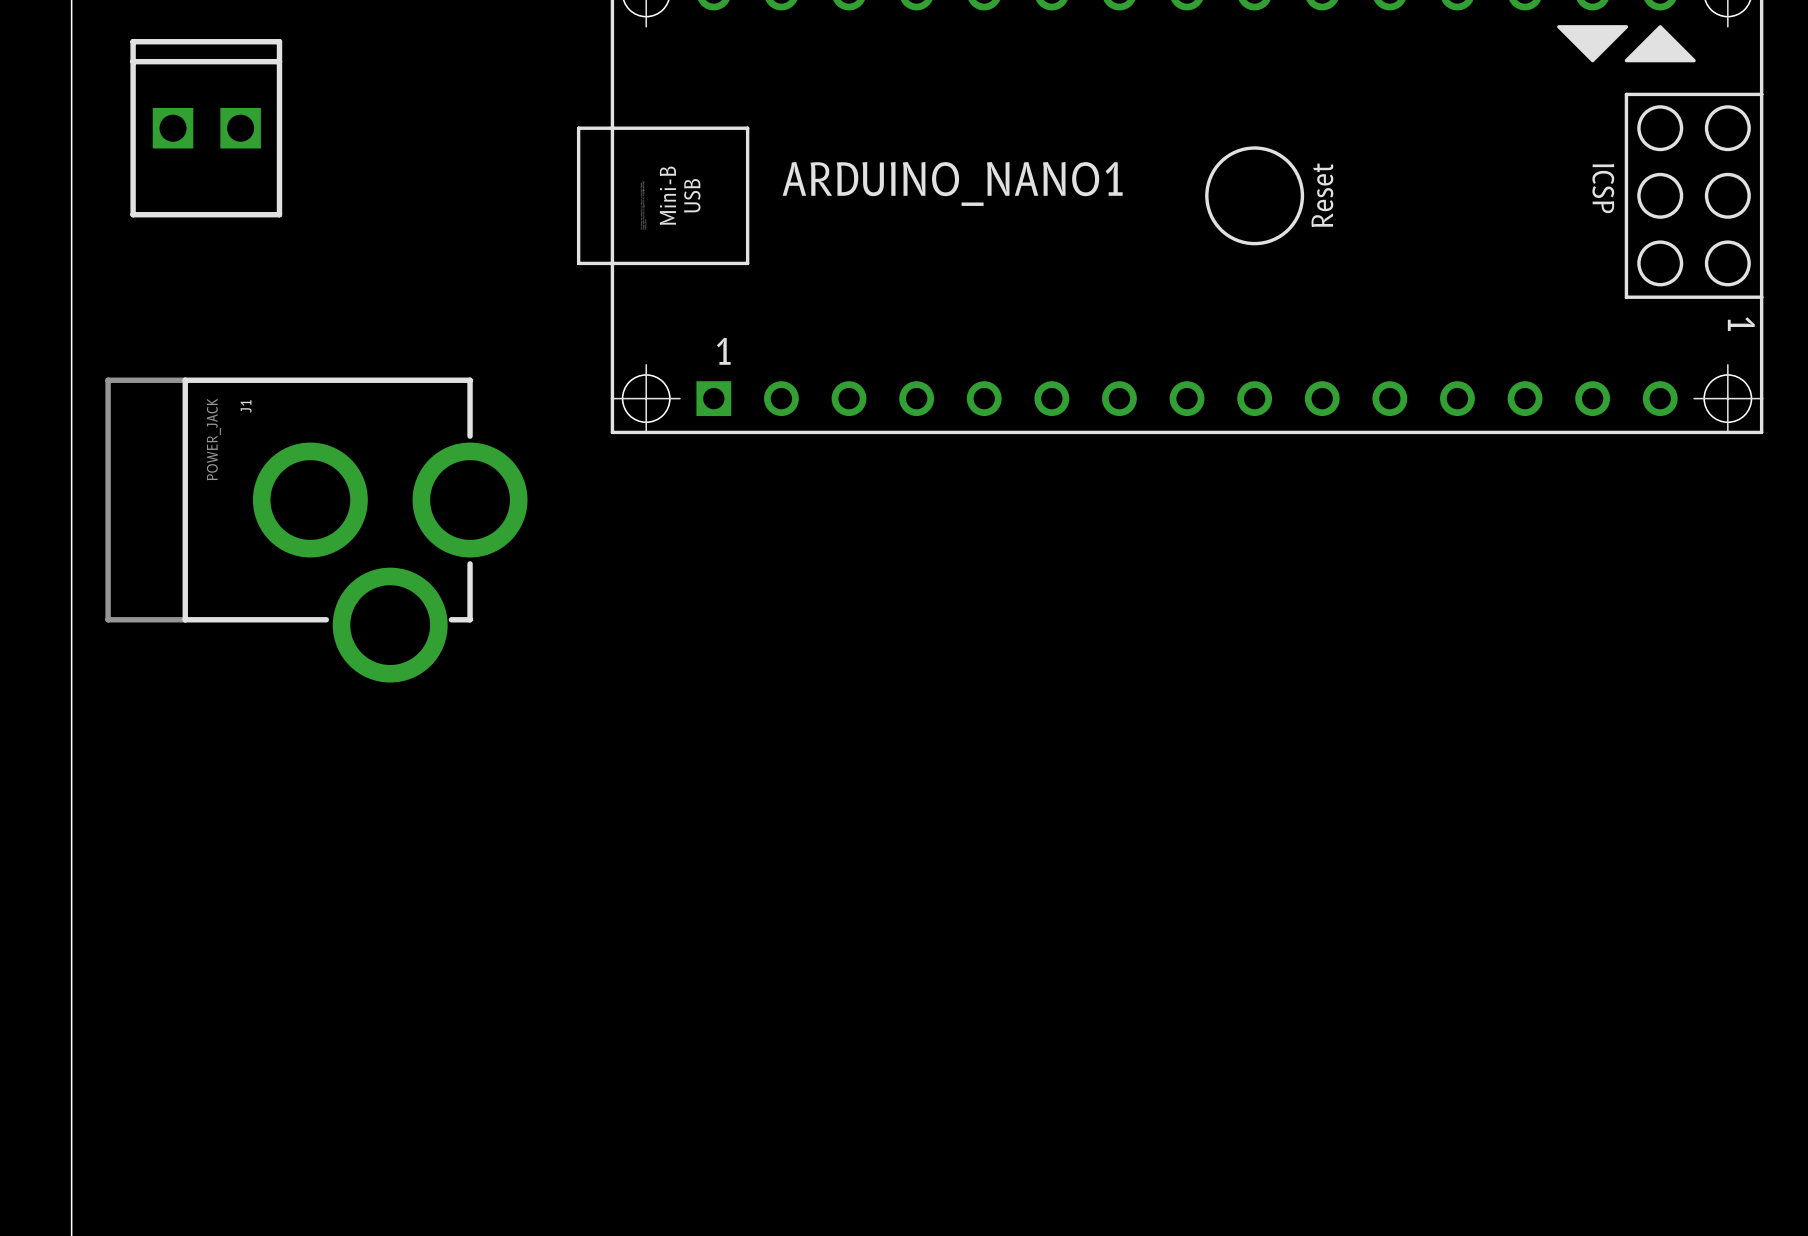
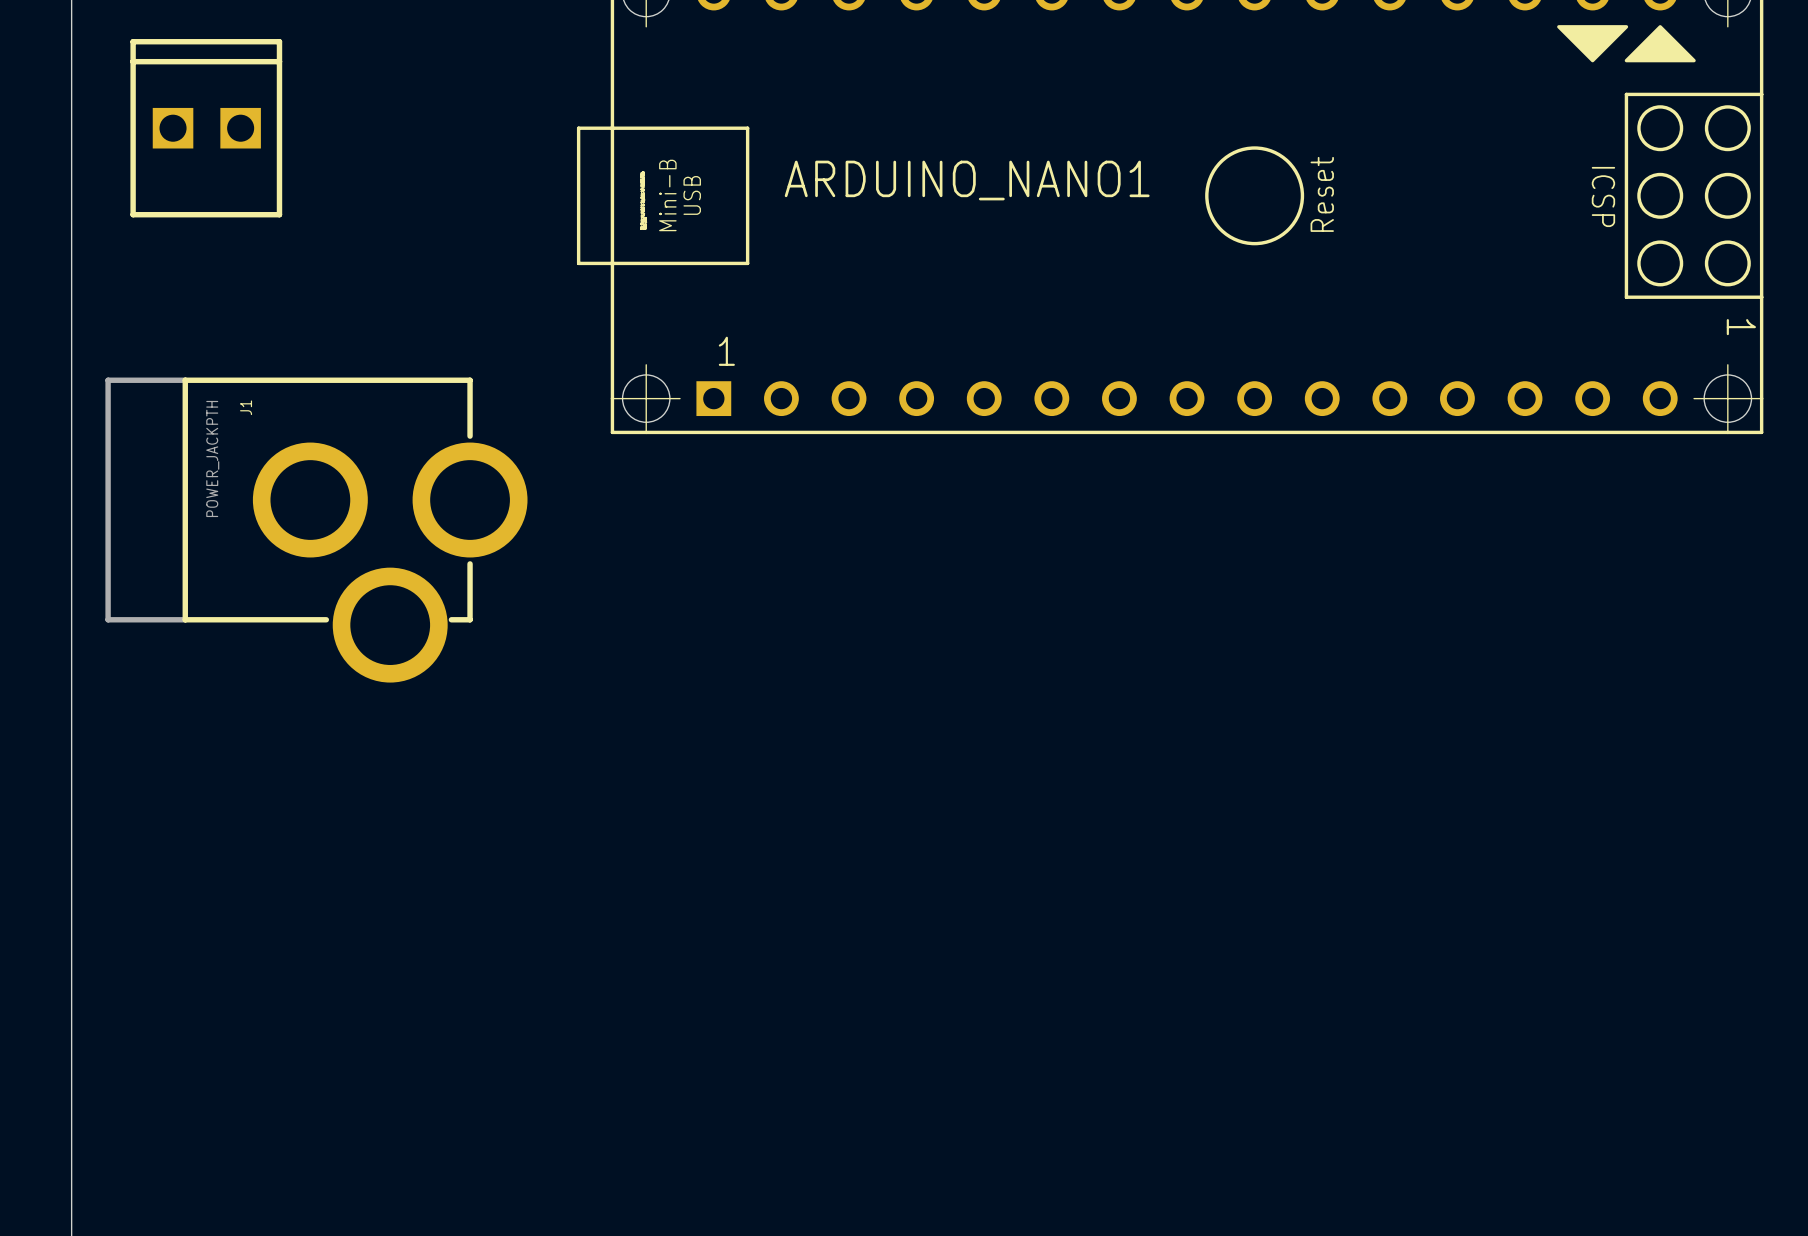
J1 value: POWER_JACK (213, 439) -> POWER_JACKPTH (212, 458)

